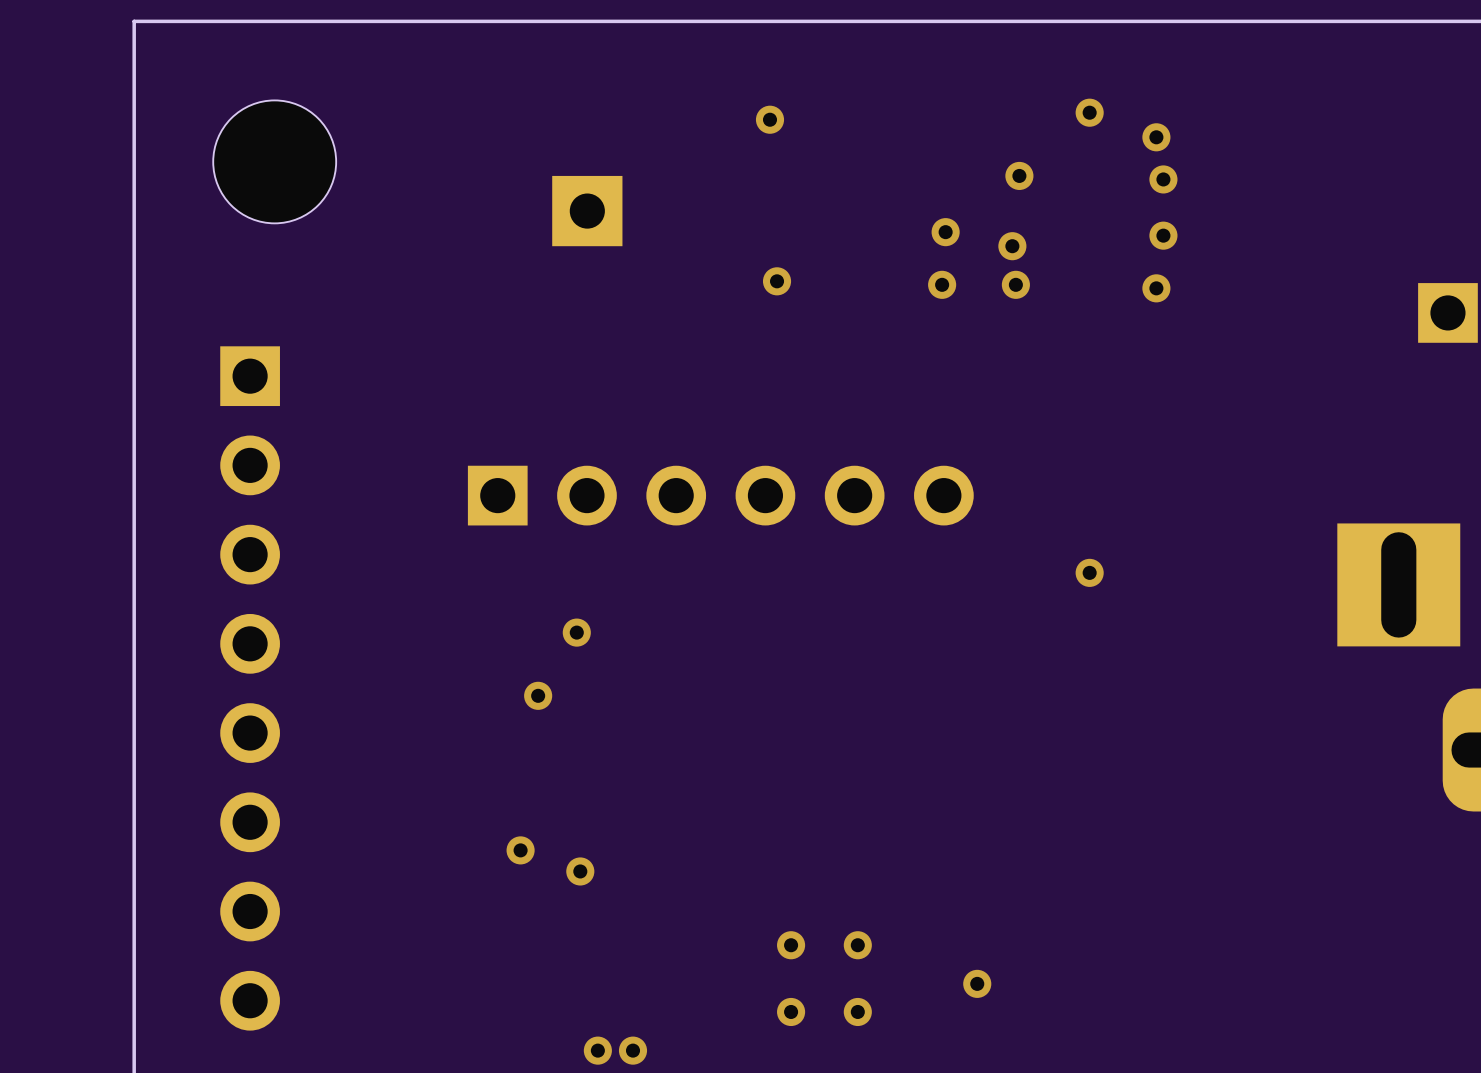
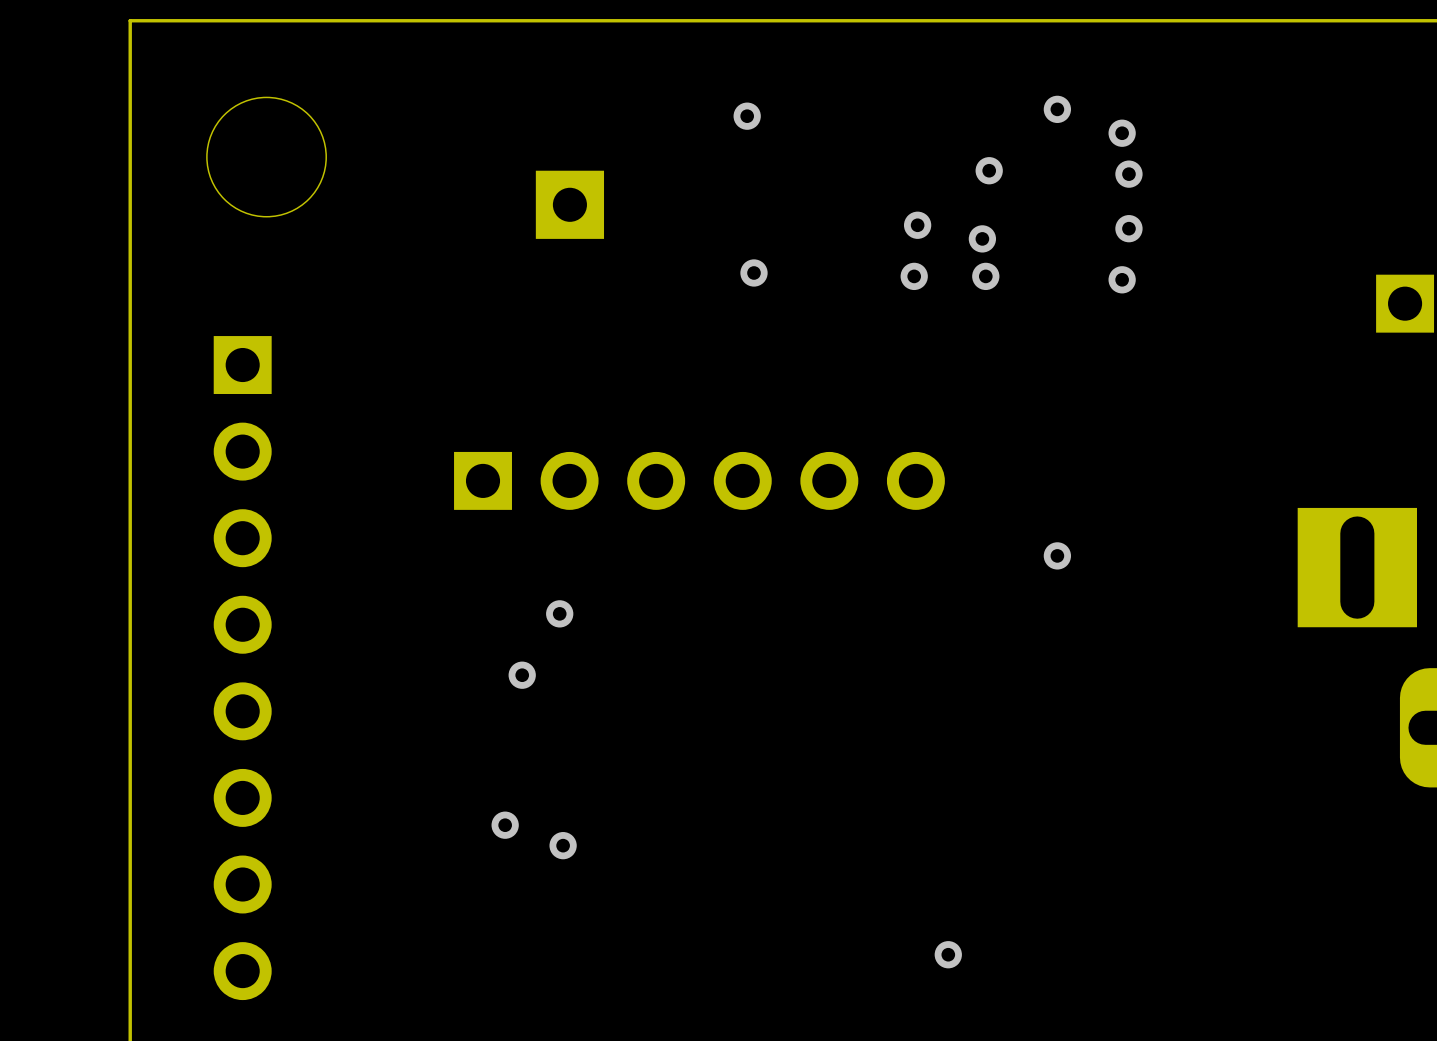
via: (791, 945) -> none
via: (857, 945) -> none
via: (791, 1011) -> none
via: (857, 1011) -> none
via: (597, 1050) -> none
via: (633, 1050) -> none

